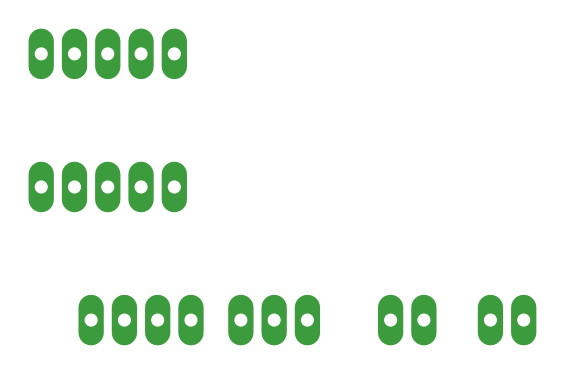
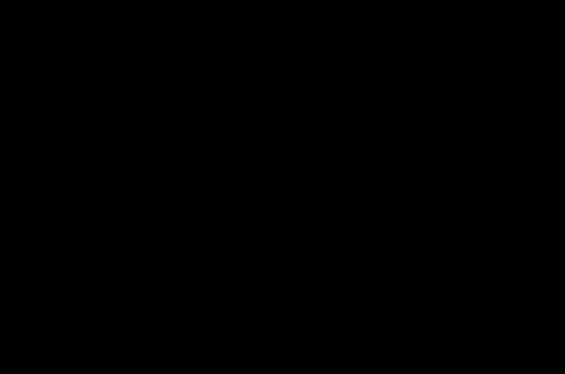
part: (107, 53) -> none
part: (107, 186) -> none
part: (141, 320) -> none
part: (274, 320) -> none
part: (407, 320) -> none
part: (507, 320) -> none

